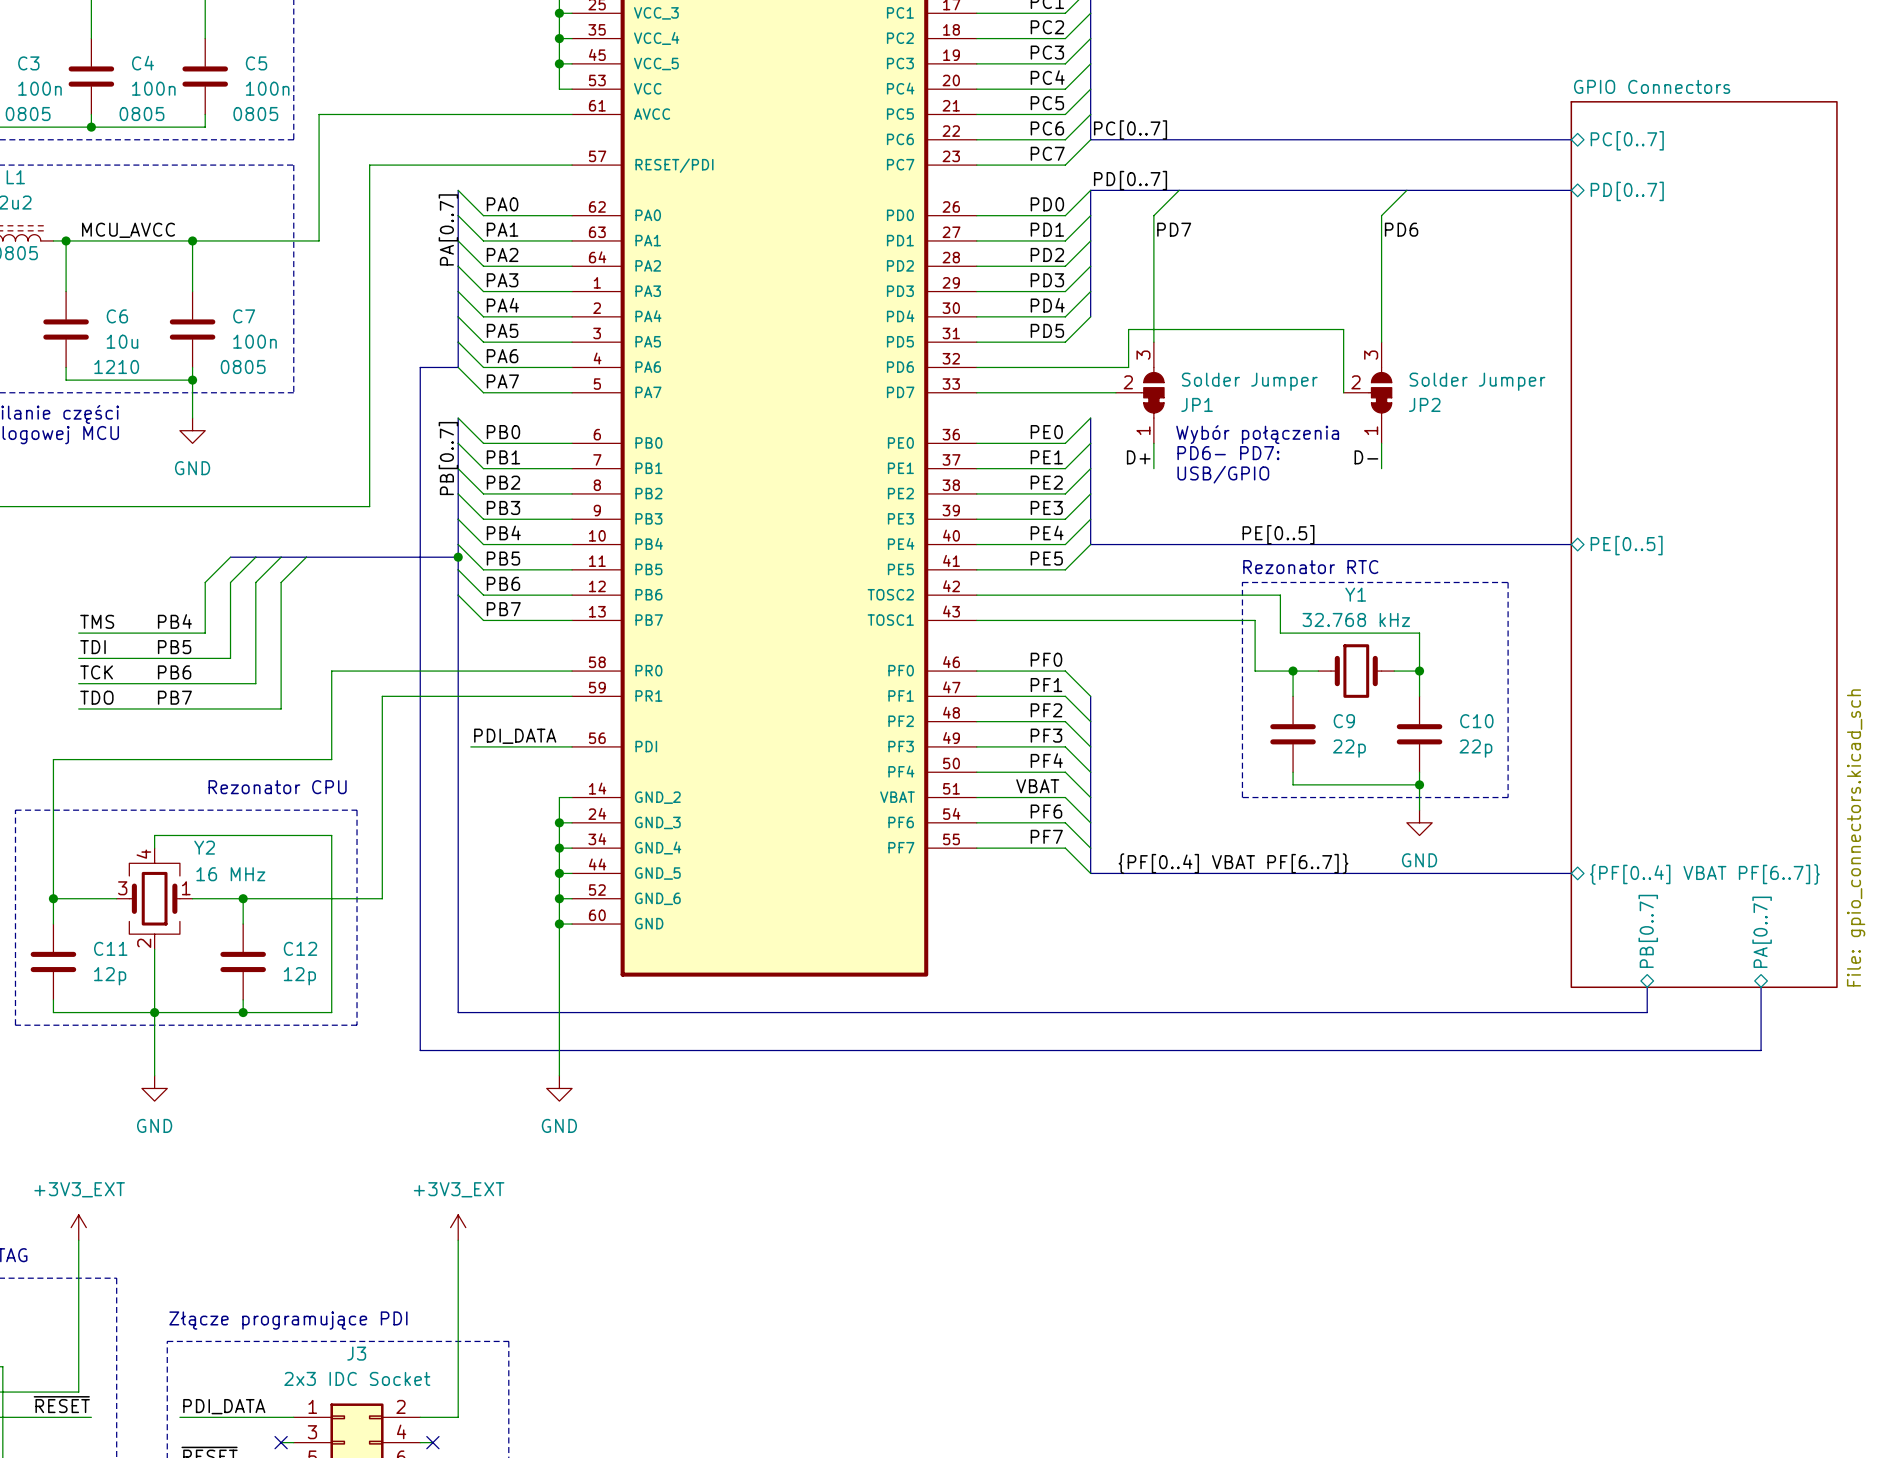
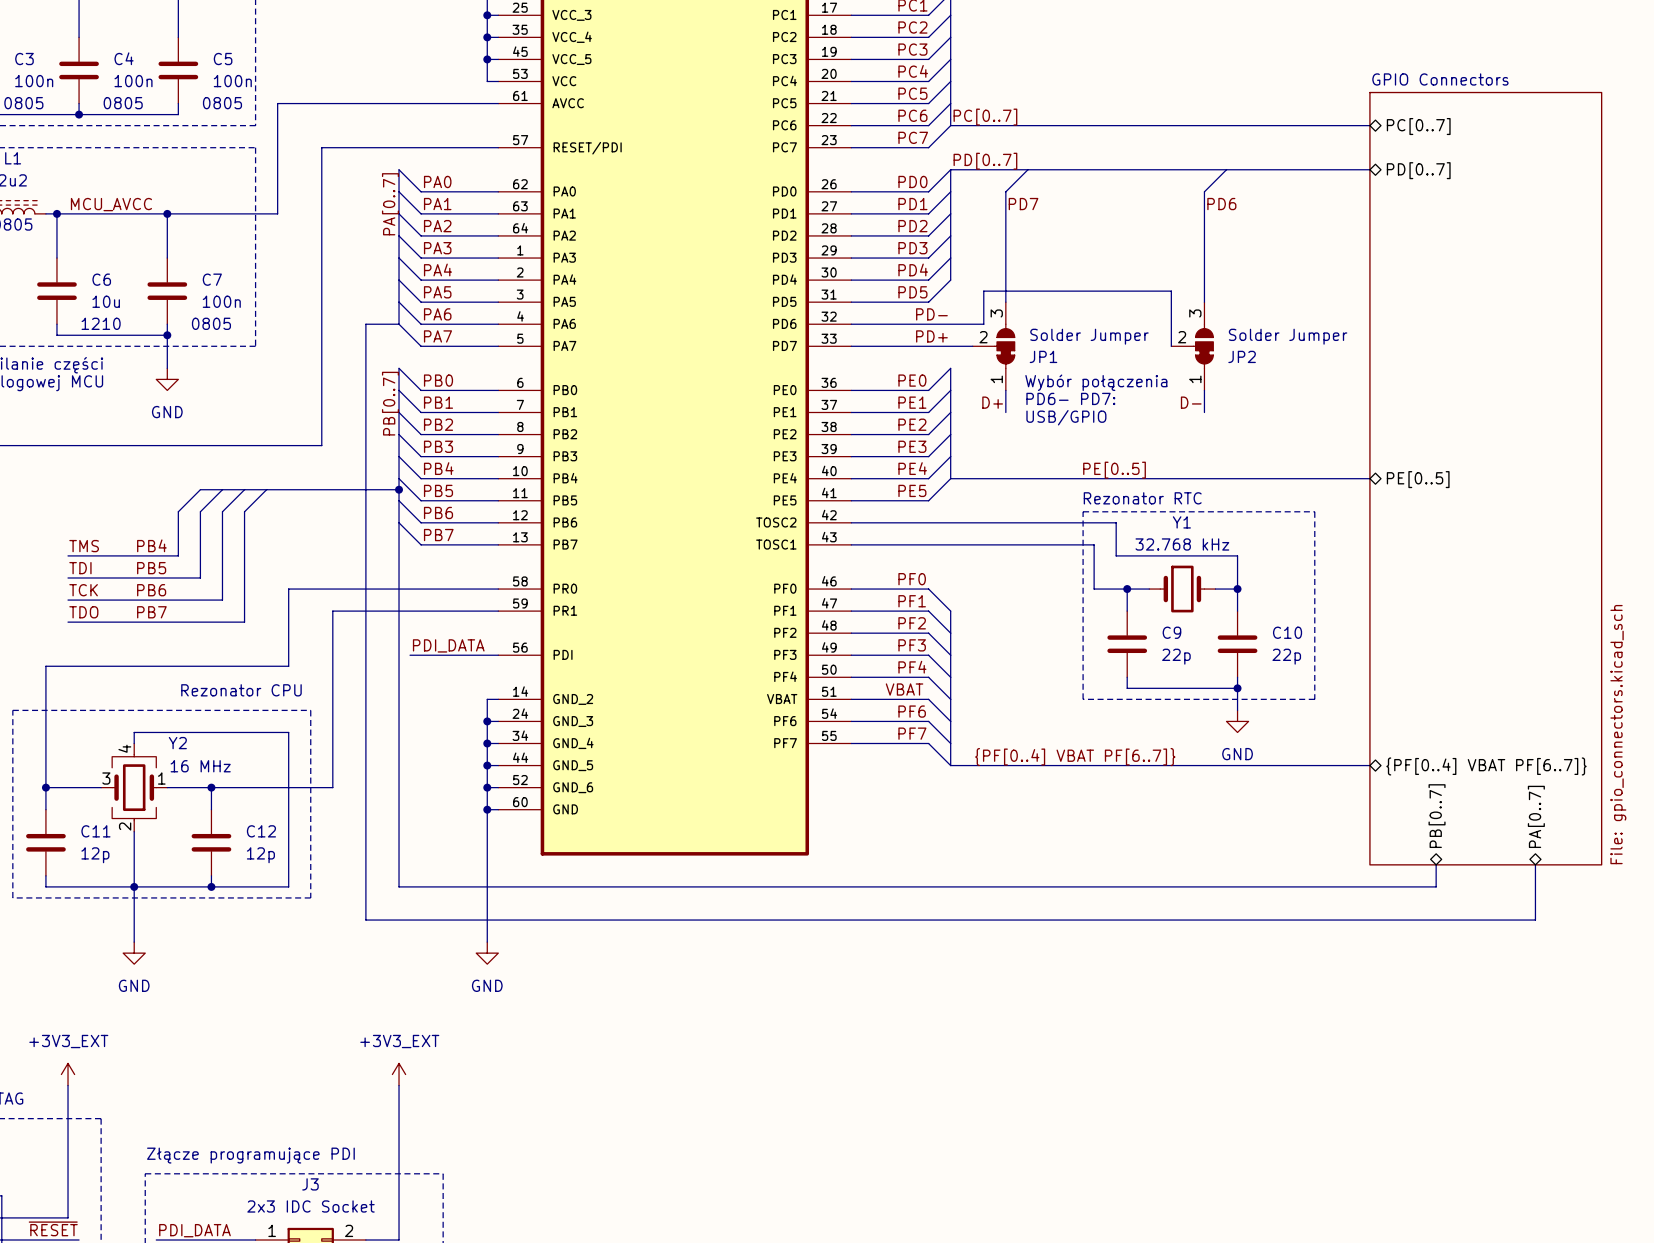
label: none -> PD- (931, 314)
label: none -> PD+ (931, 336)

